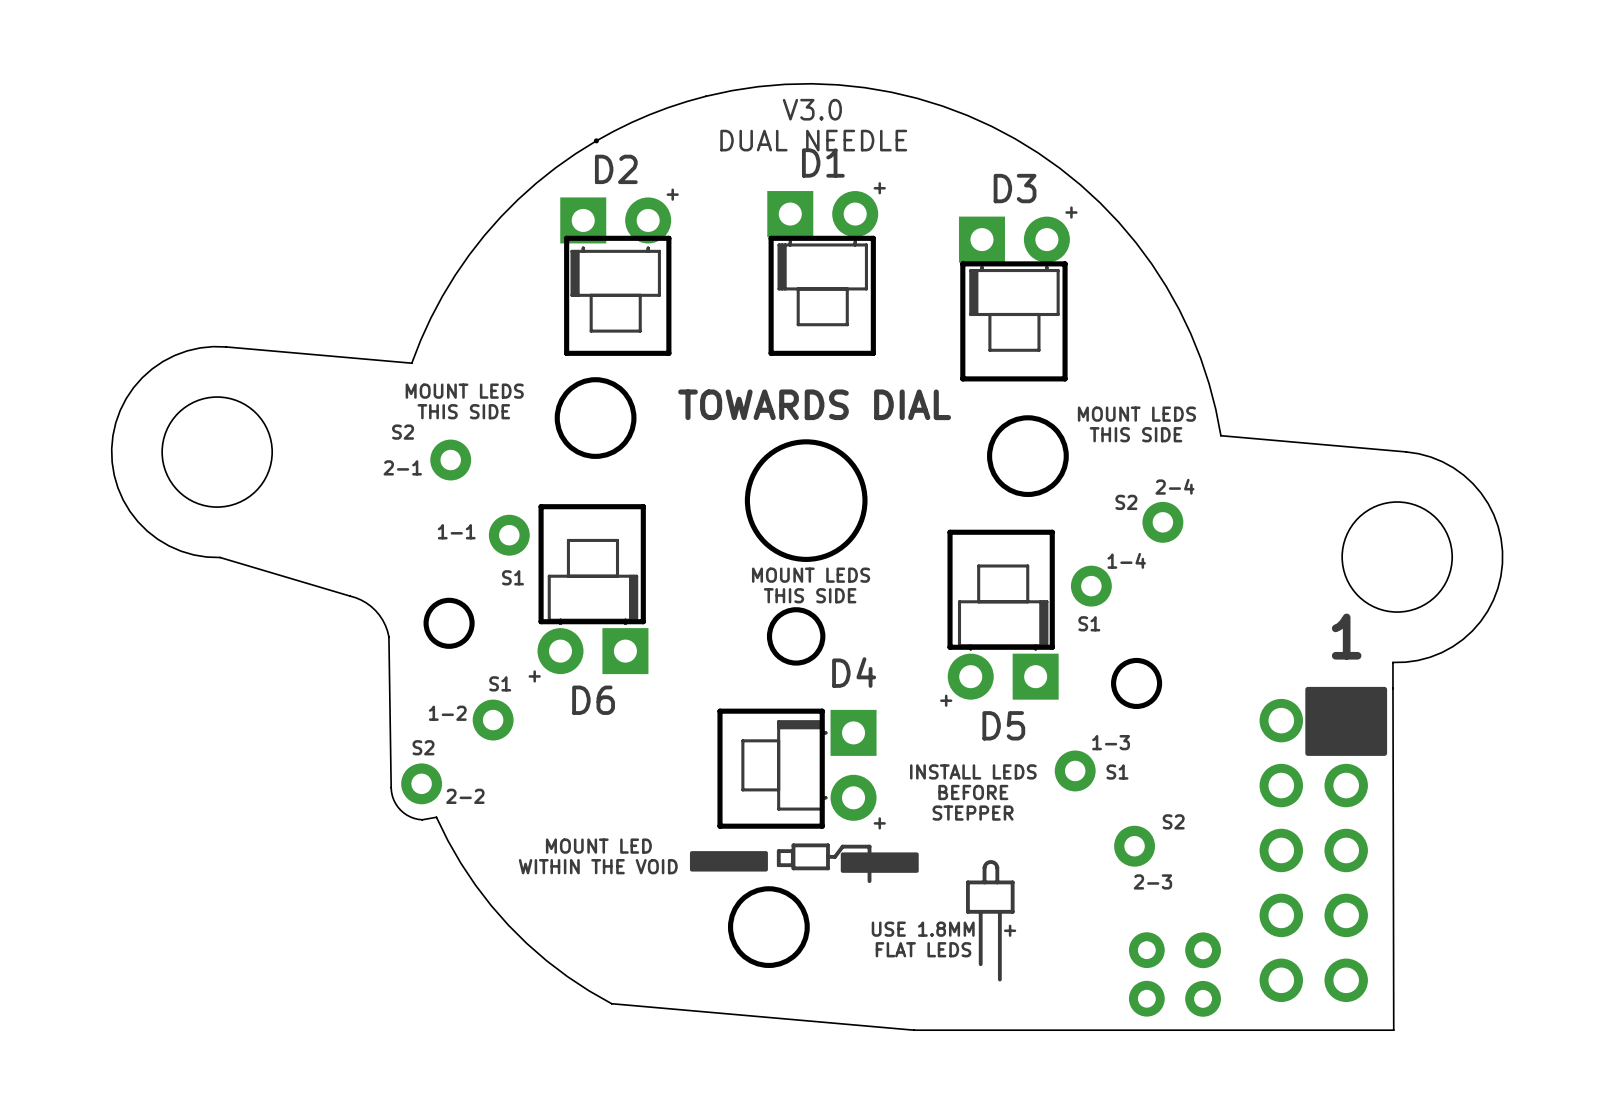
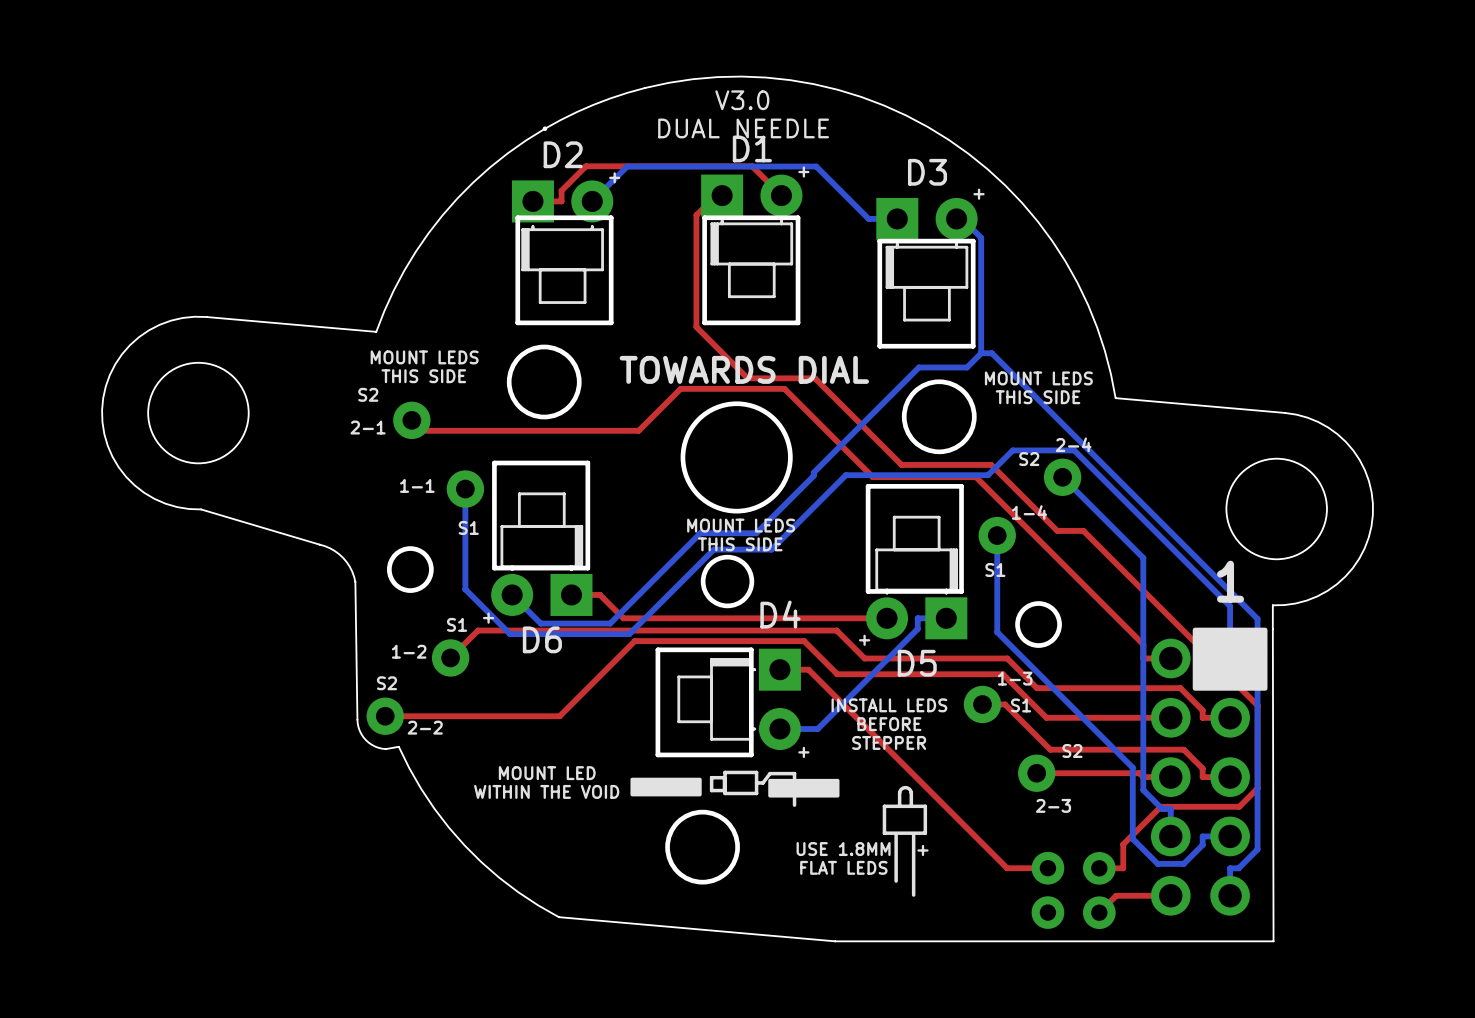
top track: none -> (722, 195) (716, 195) (696, 215) (696, 327) (747, 378) (814, 378) (901, 464) (991, 464) (1057, 530) (1083, 530) (1200, 647) (1200, 680) (1206, 685) (1238, 685) (1257, 705) (1257, 788) (1239, 806) (1160, 806) (1123, 844) (1123, 868) (1099, 868)
top track: none -> (781, 195) (752, 166) (585, 166) (561, 190) (561, 201) (532, 201)
bottom track: none -> (592, 201) (627, 166) (816, 166) (868, 218) (897, 218)
bottom track: none -> (956, 218) (962, 218) (981, 237) (981, 353)
bottom track: none -> (981, 353) (991, 353) (1257, 618) (1257, 849) (1238, 868) (1230, 868) (1230, 895)
bottom track: none -> (981, 353) (967, 367) (918, 367) (756, 533) (700, 533) (610, 623) (540, 623) (512, 594)
top track: none -> (411, 420) (422, 430) (638, 430) (680, 388) (784, 388) (872, 477) (976, 477) (1143, 644) (1143, 658) (1170, 658)
bottom track: none -> (1062, 477) (1143, 558) (1143, 790) (1162, 809) (1170, 809) (1170, 836)
bottom track: none -> (465, 489) (465, 589) (510, 634) (629, 634) (713, 549) (771, 549) (845, 475) (988, 475) (1012, 450) (1074, 450) (1230, 606) (1230, 658)
bottom track: none -> (997, 535) (997, 632) (1132, 767) (1132, 838) (1157, 863) (1183, 863) (1202, 845) (1202, 836) (1230, 836)
top track: none -> (571, 594) (600, 594) (623, 618) (887, 618)
bottom track: none -> (946, 618) (917, 618) (917, 629) (817, 729) (779, 729)
top track: none -> (450, 657) (478, 630) (836, 630) (864, 658) (1007, 658) (1037, 688) (1180, 688) (1202, 710) (1202, 717) (1230, 717)
top track: none -> (779, 669) (808, 669) (1007, 868) (1047, 868)
top track: none -> (982, 704) (1005, 704) (1050, 749) (1183, 749) (1202, 768) (1202, 777) (1230, 777)
top track: none -> (385, 716) (559, 716) (634, 641) (804, 641) (837, 674) (1002, 674) (1046, 717) (1170, 717)
top track: none -> (1036, 773) (1139, 773) (1143, 777) (1170, 777)
top track: none -> (1170, 895) (1116, 895) (1099, 912)

